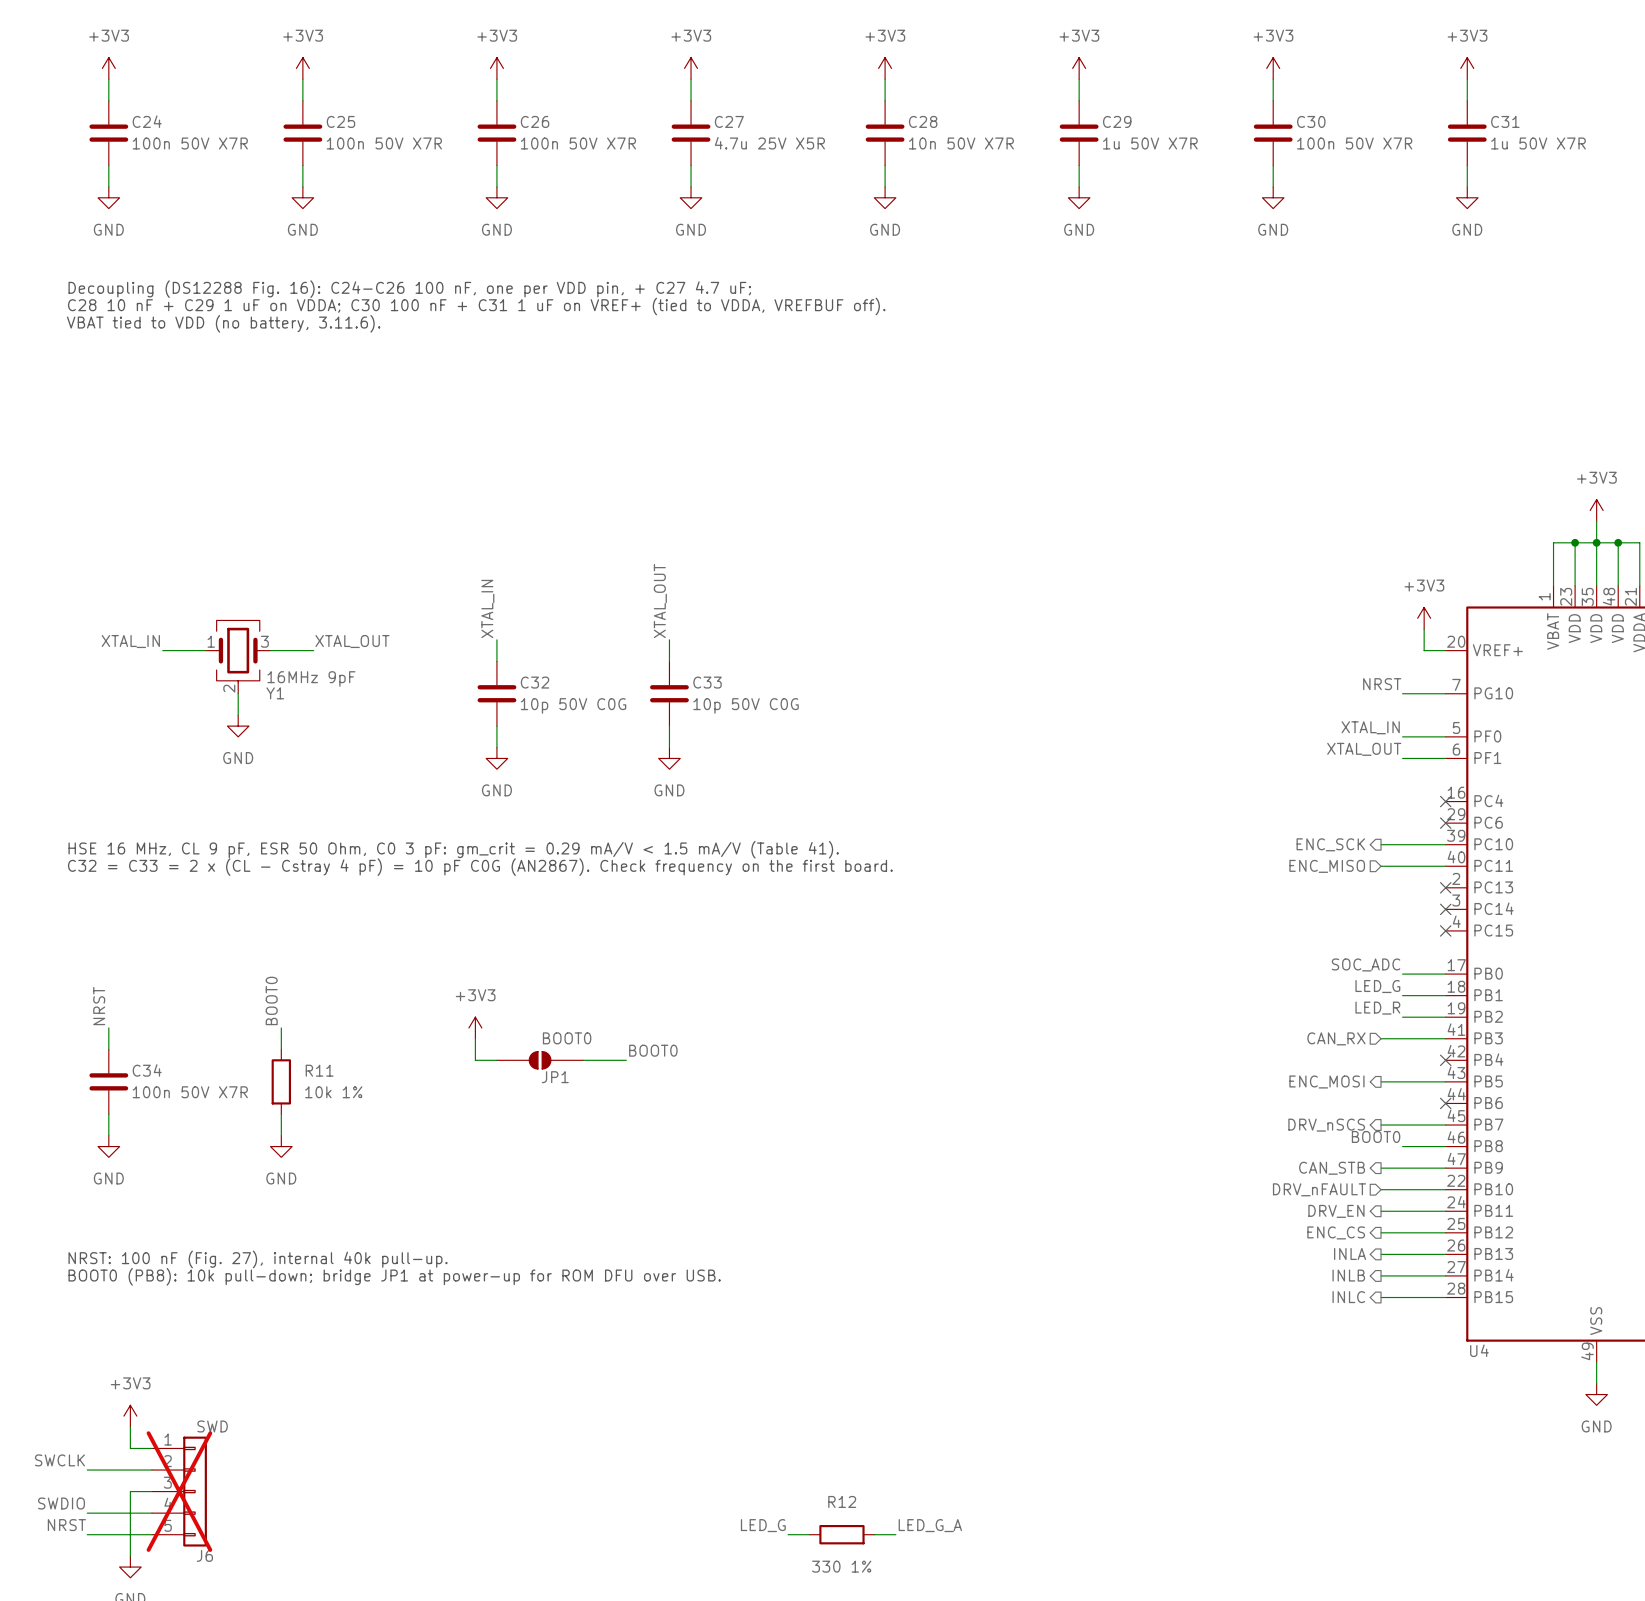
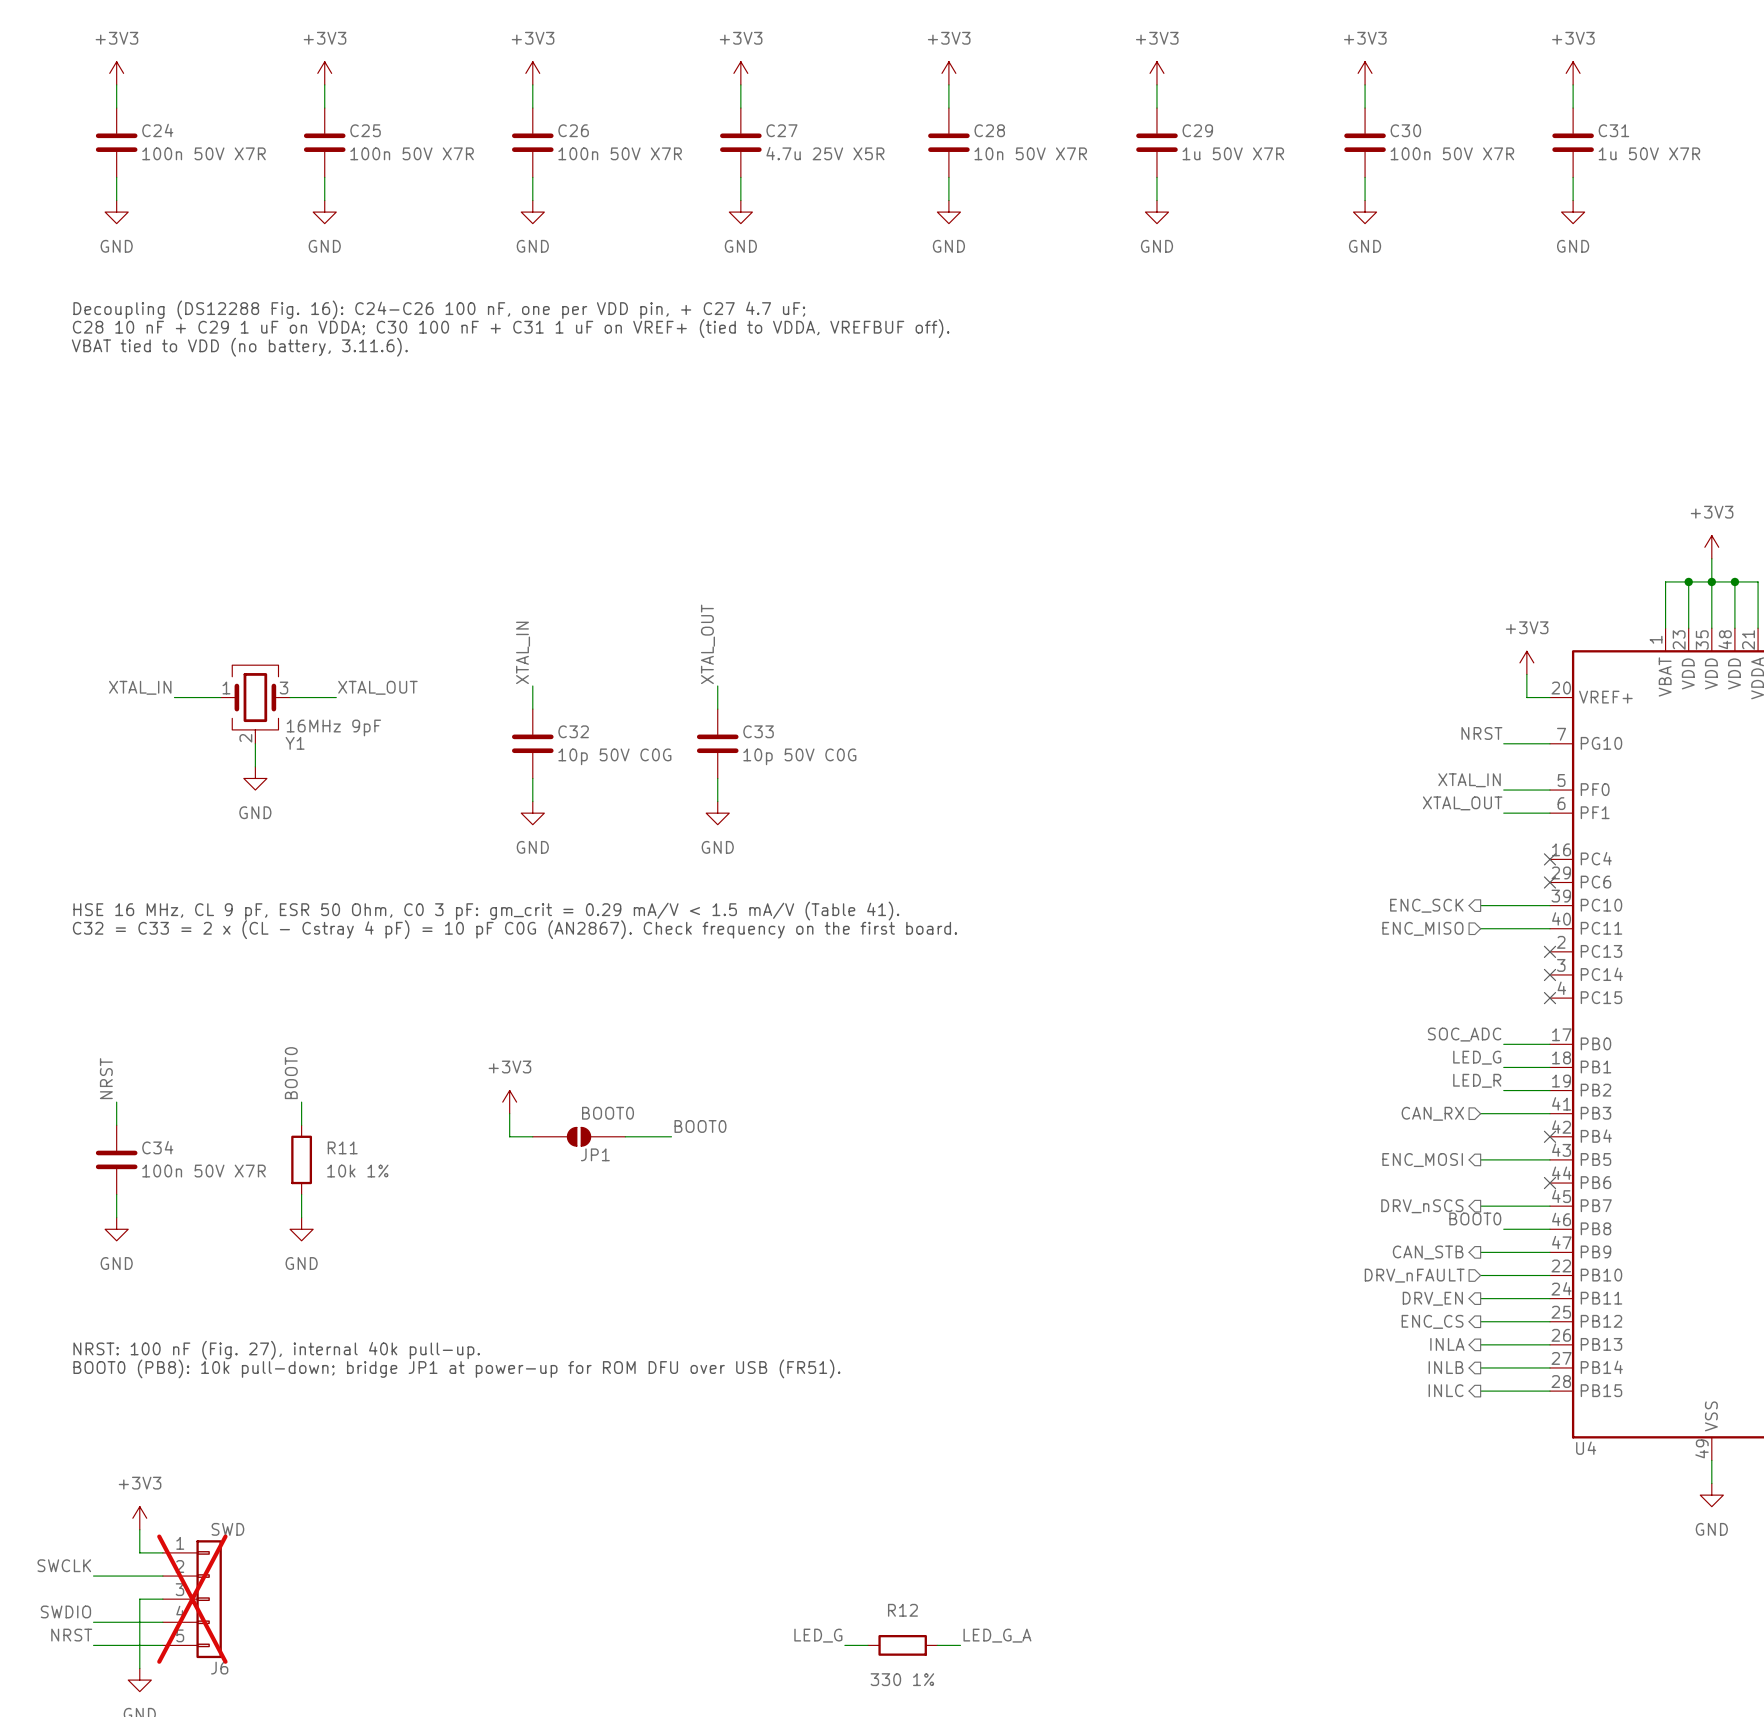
text: BOOT0 (PB8): 10k pull-down; bridge JP1 at power-up for ROM DFU over USB. (394, 1276) -> BOOT0 (PB8): 10k pull-down; bridge JP1 at power-up for ROM DFU over USB (FR51). (456, 1368)

